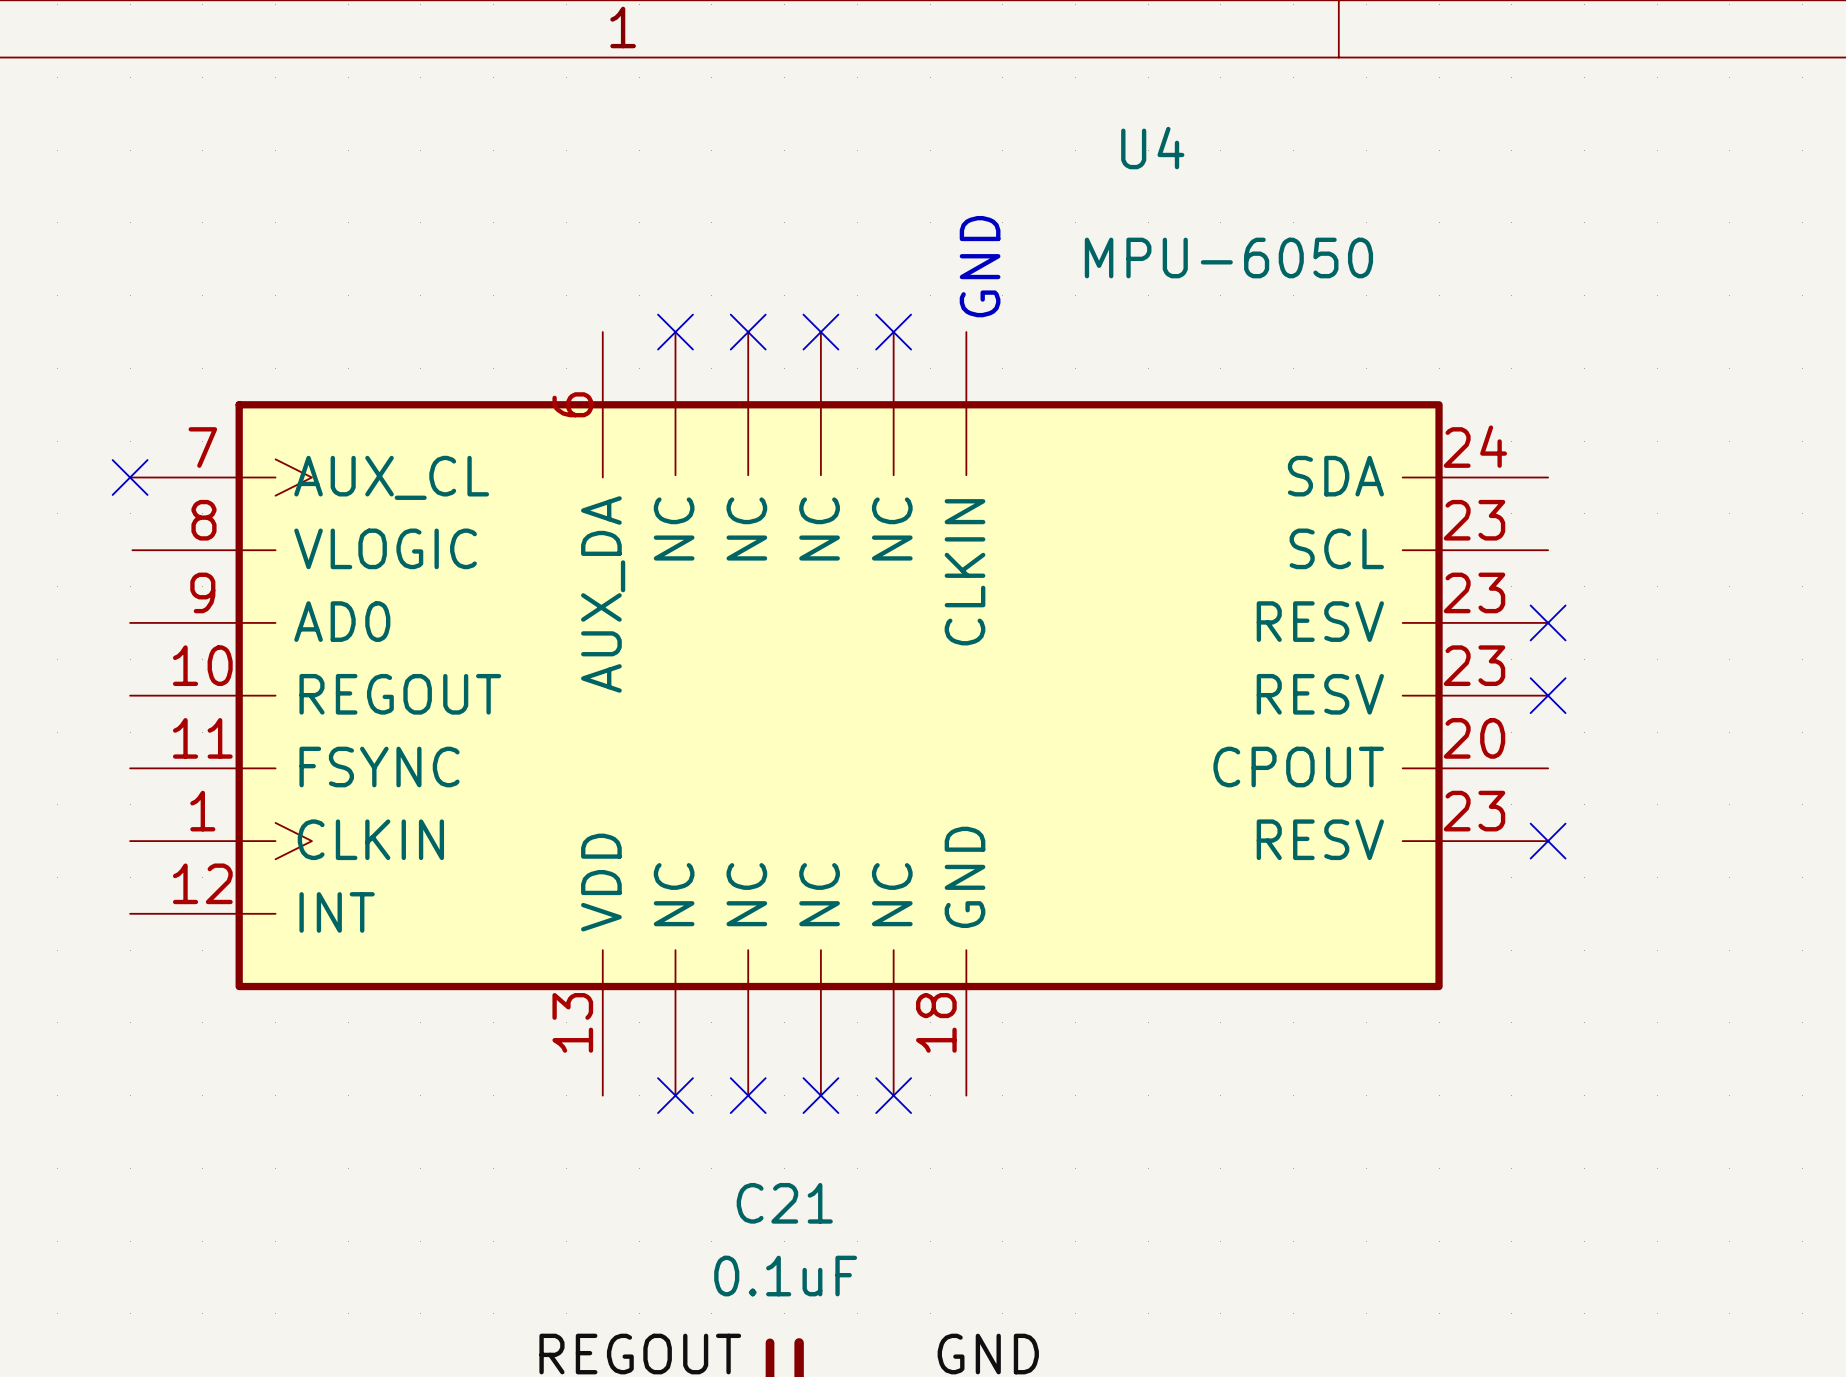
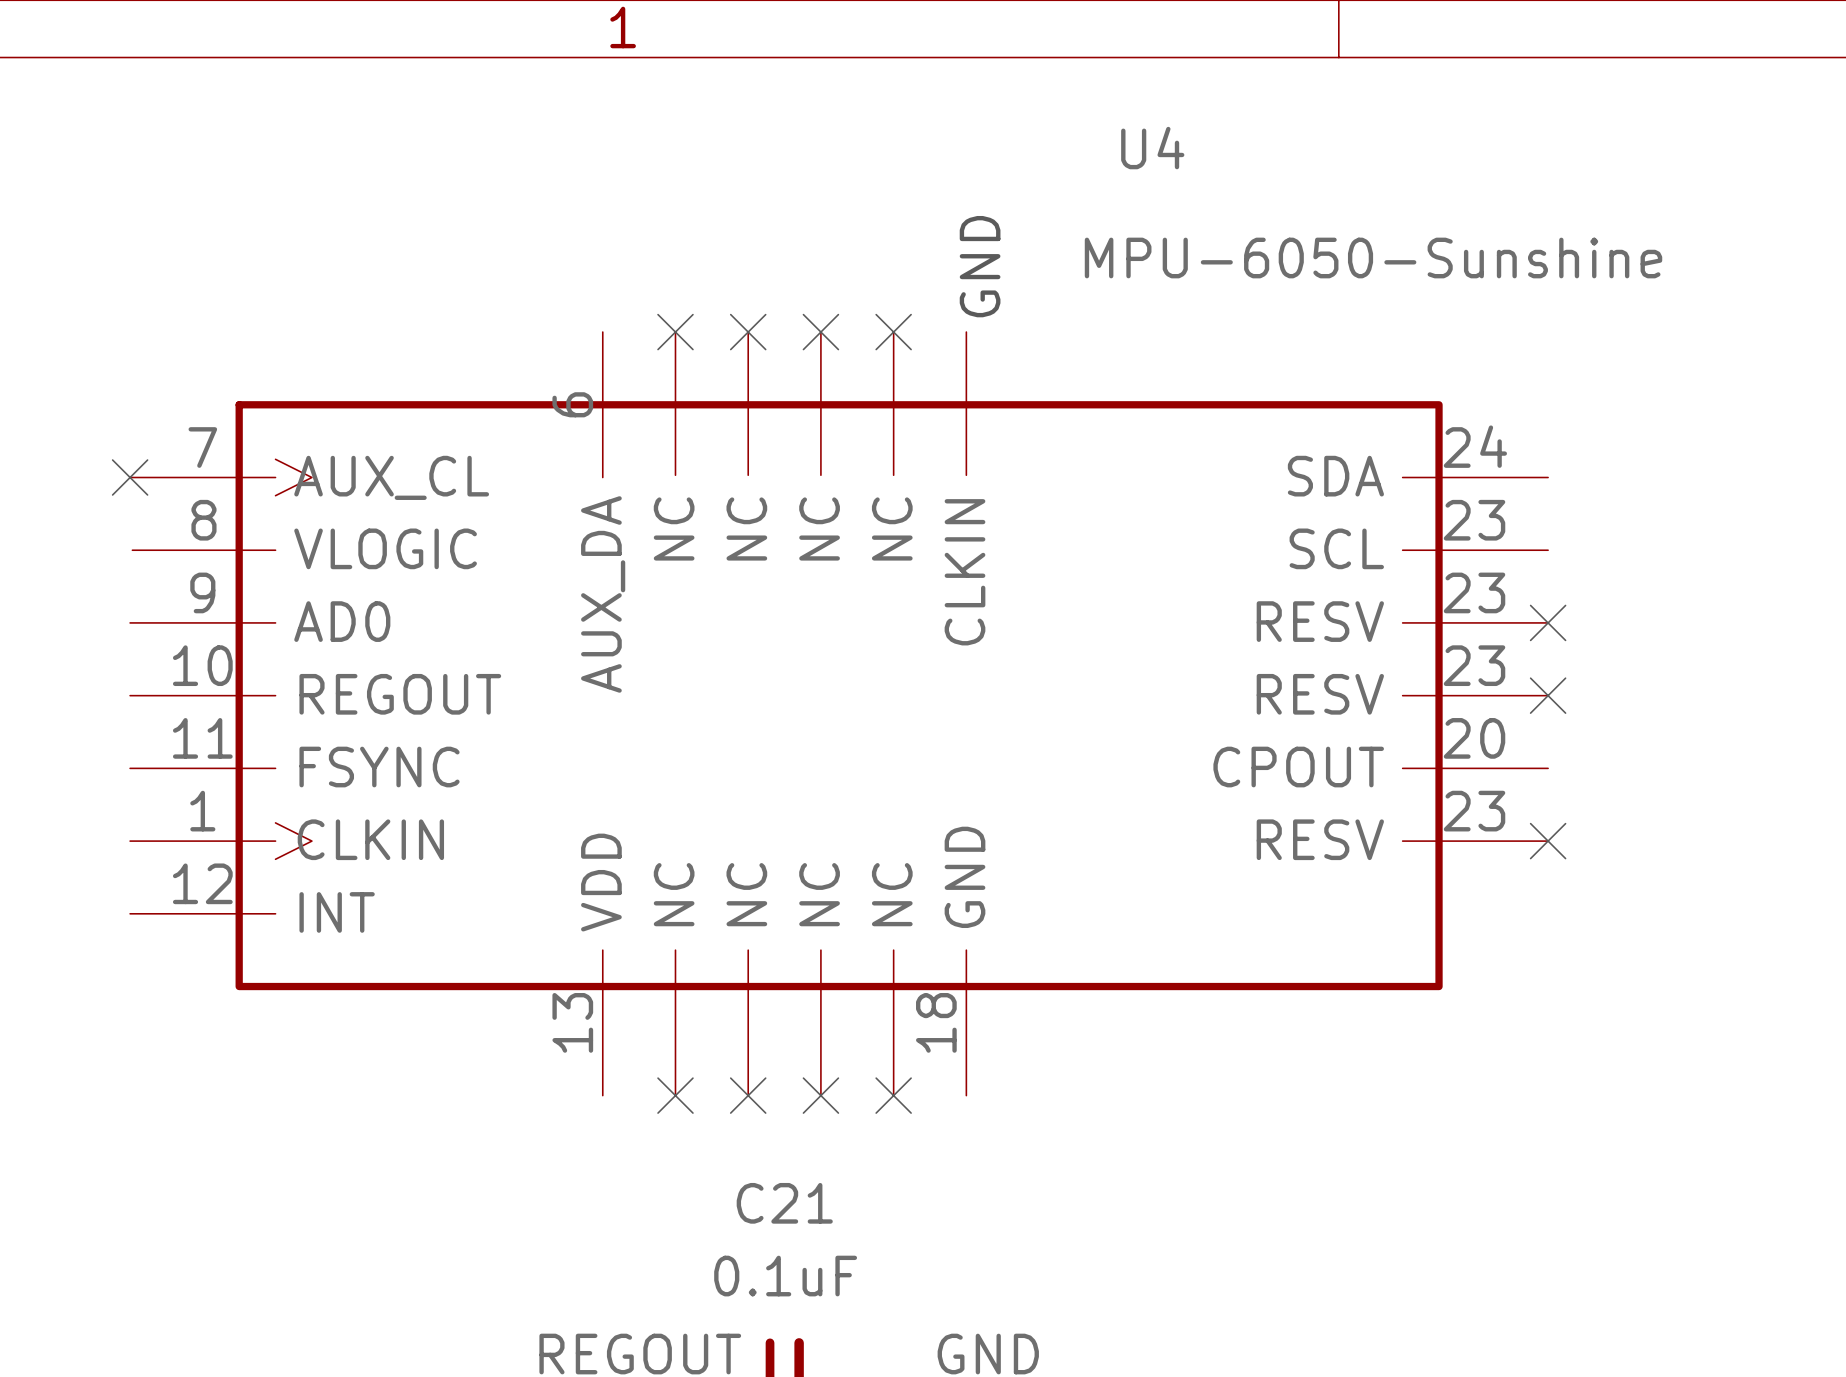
U4 value: MPU-6050 (1228, 257) -> MPU-6050-Sunshine (1373, 257)

